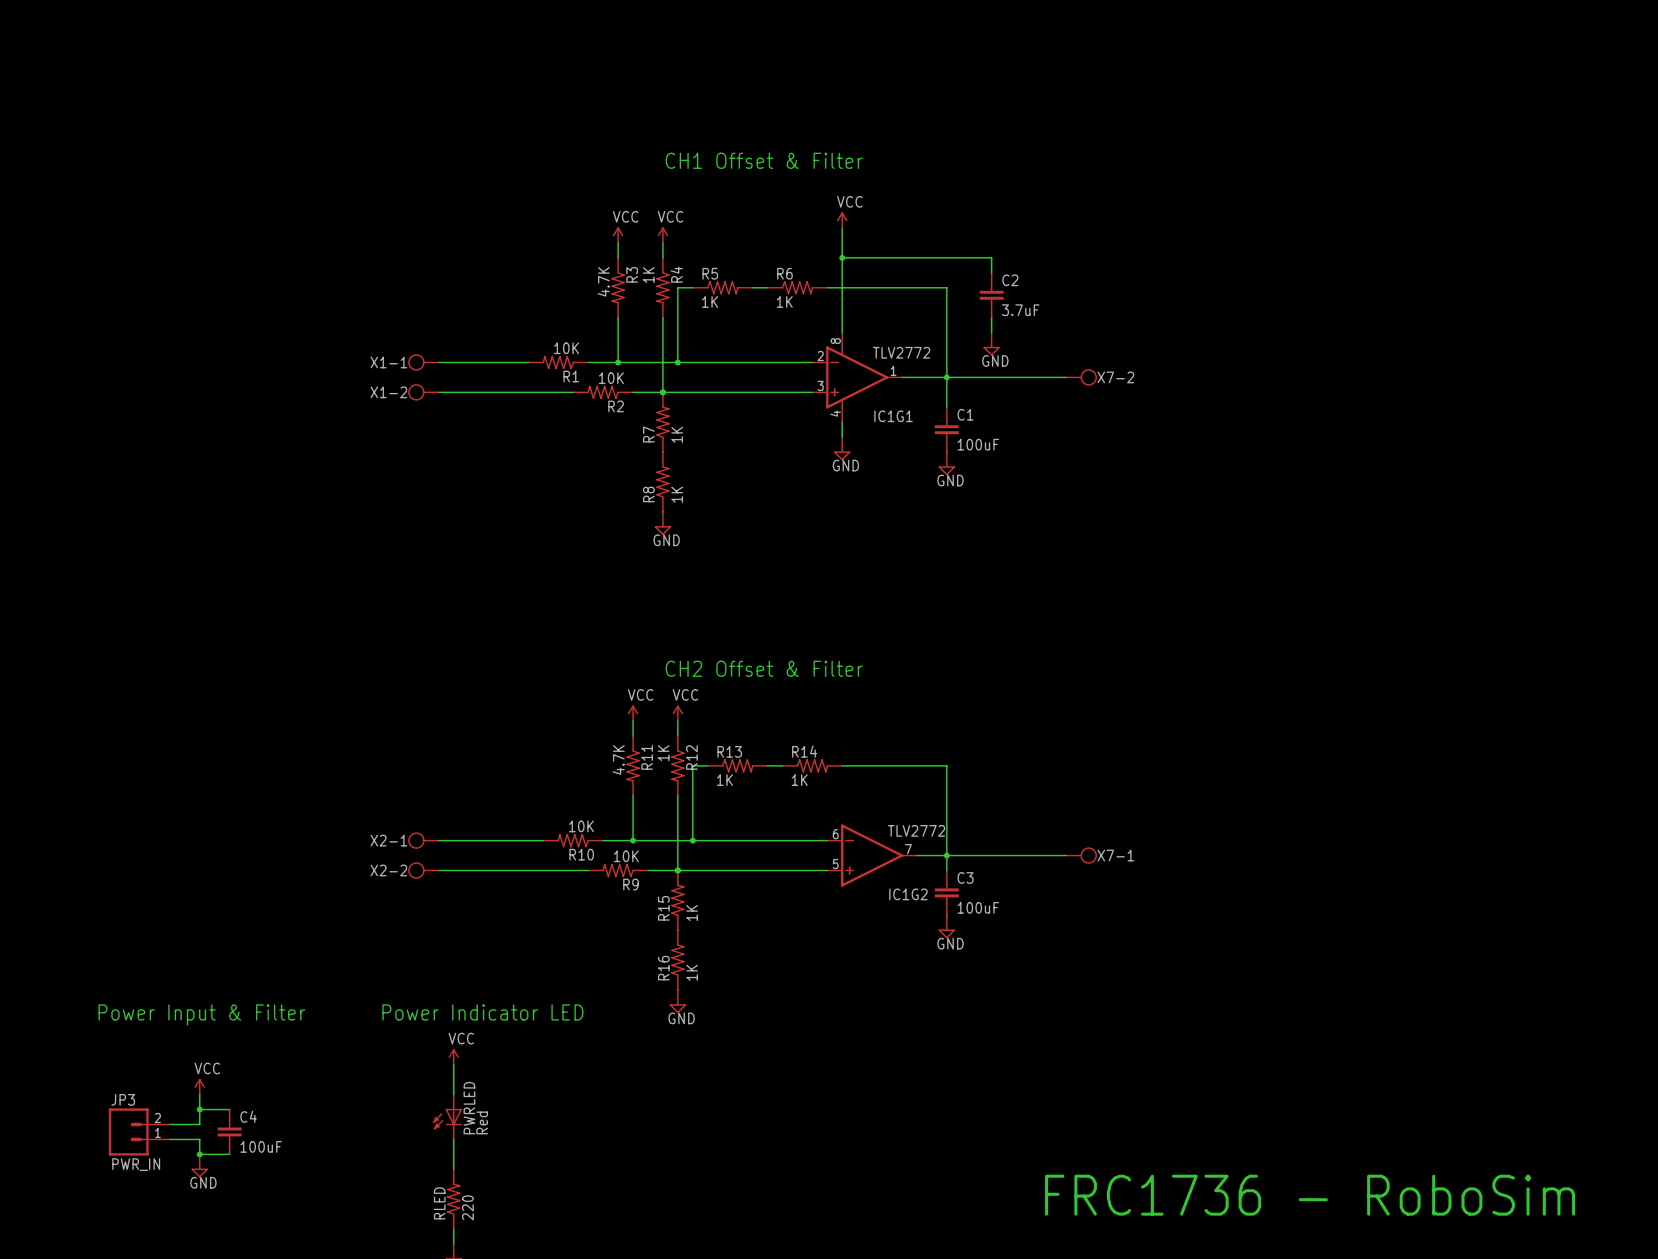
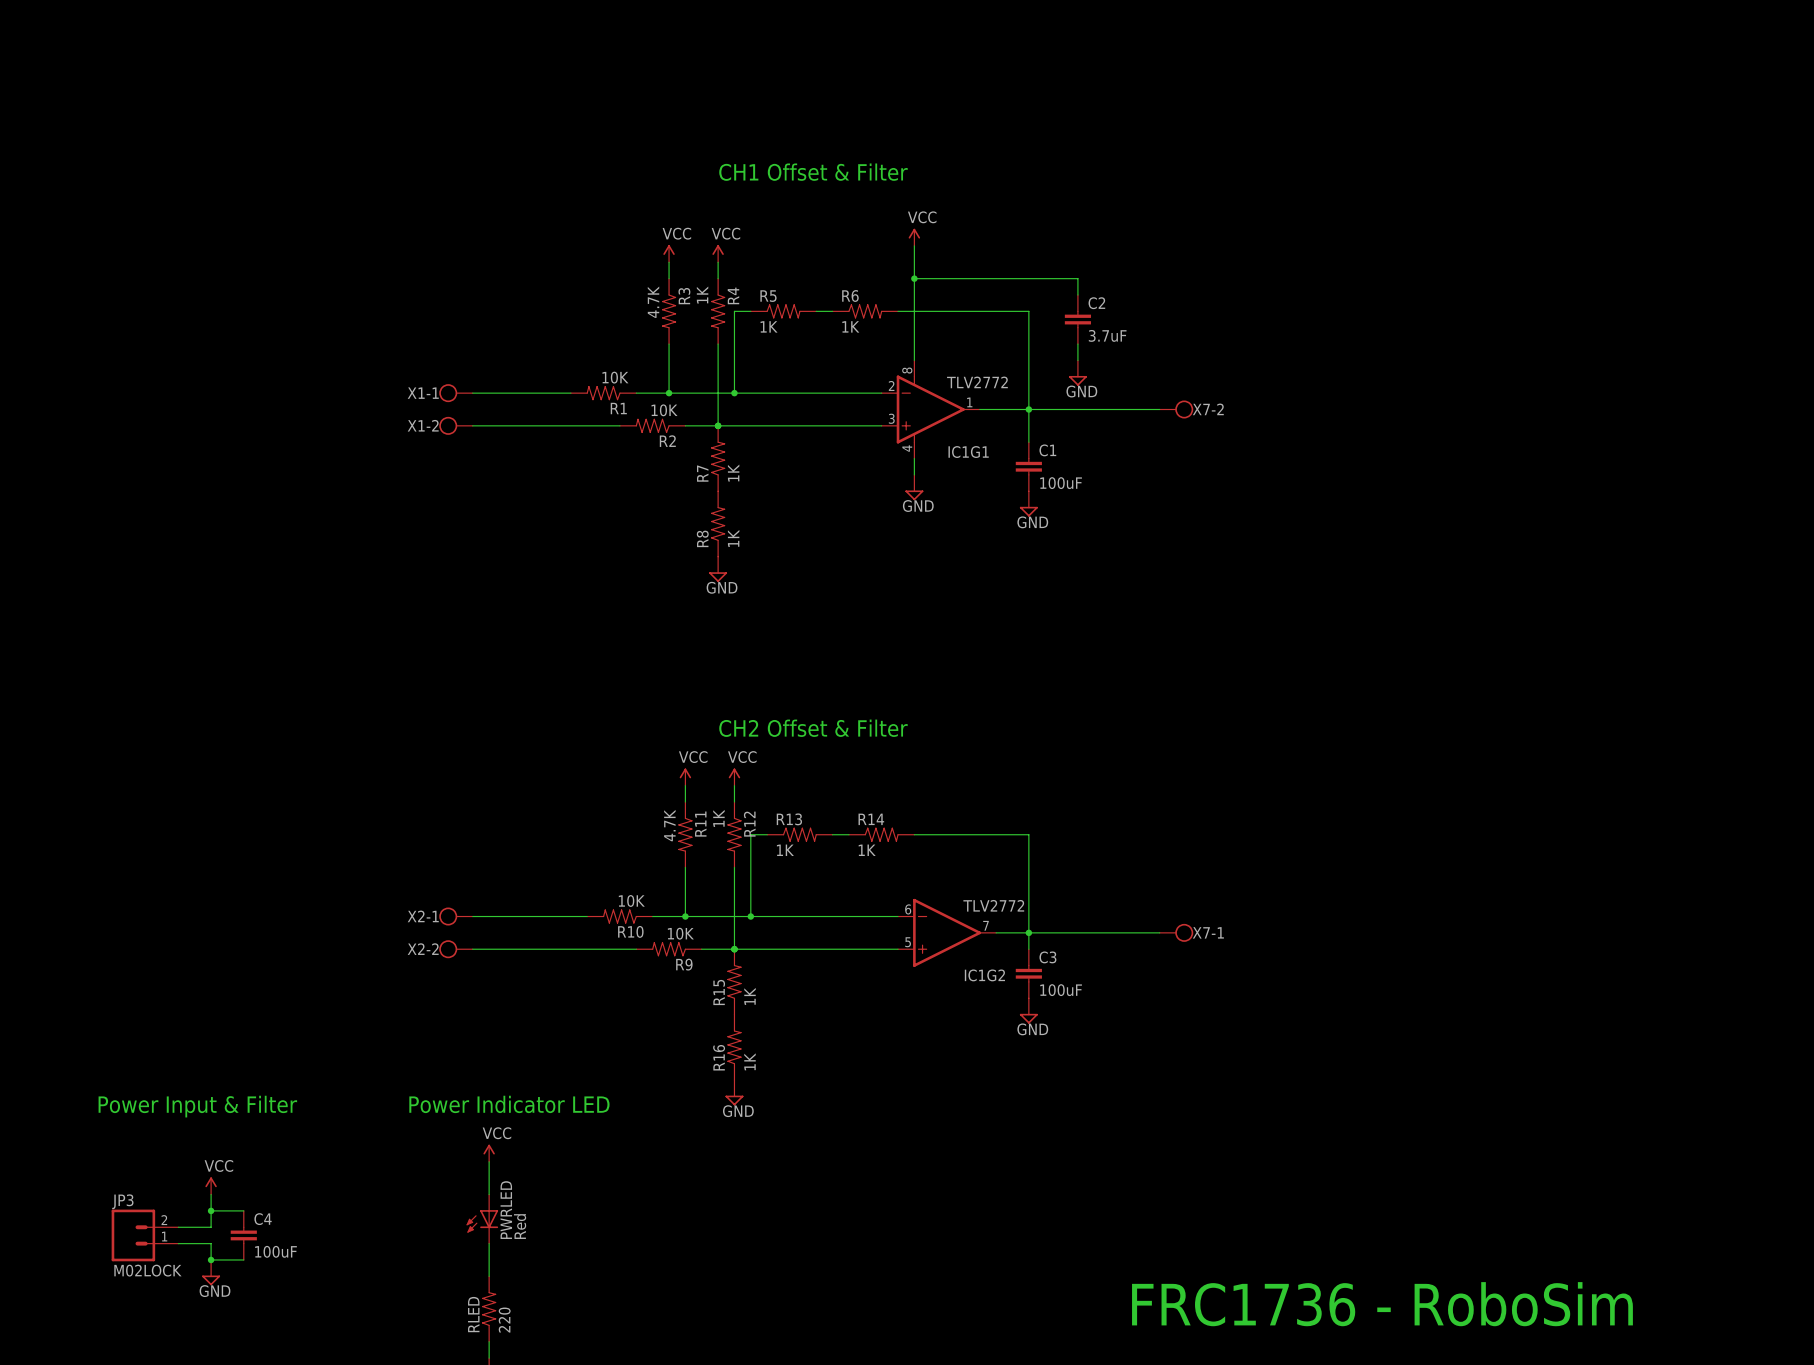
JP3 value: PWR_IN (136, 1164) -> M02LOCK (147, 1270)

